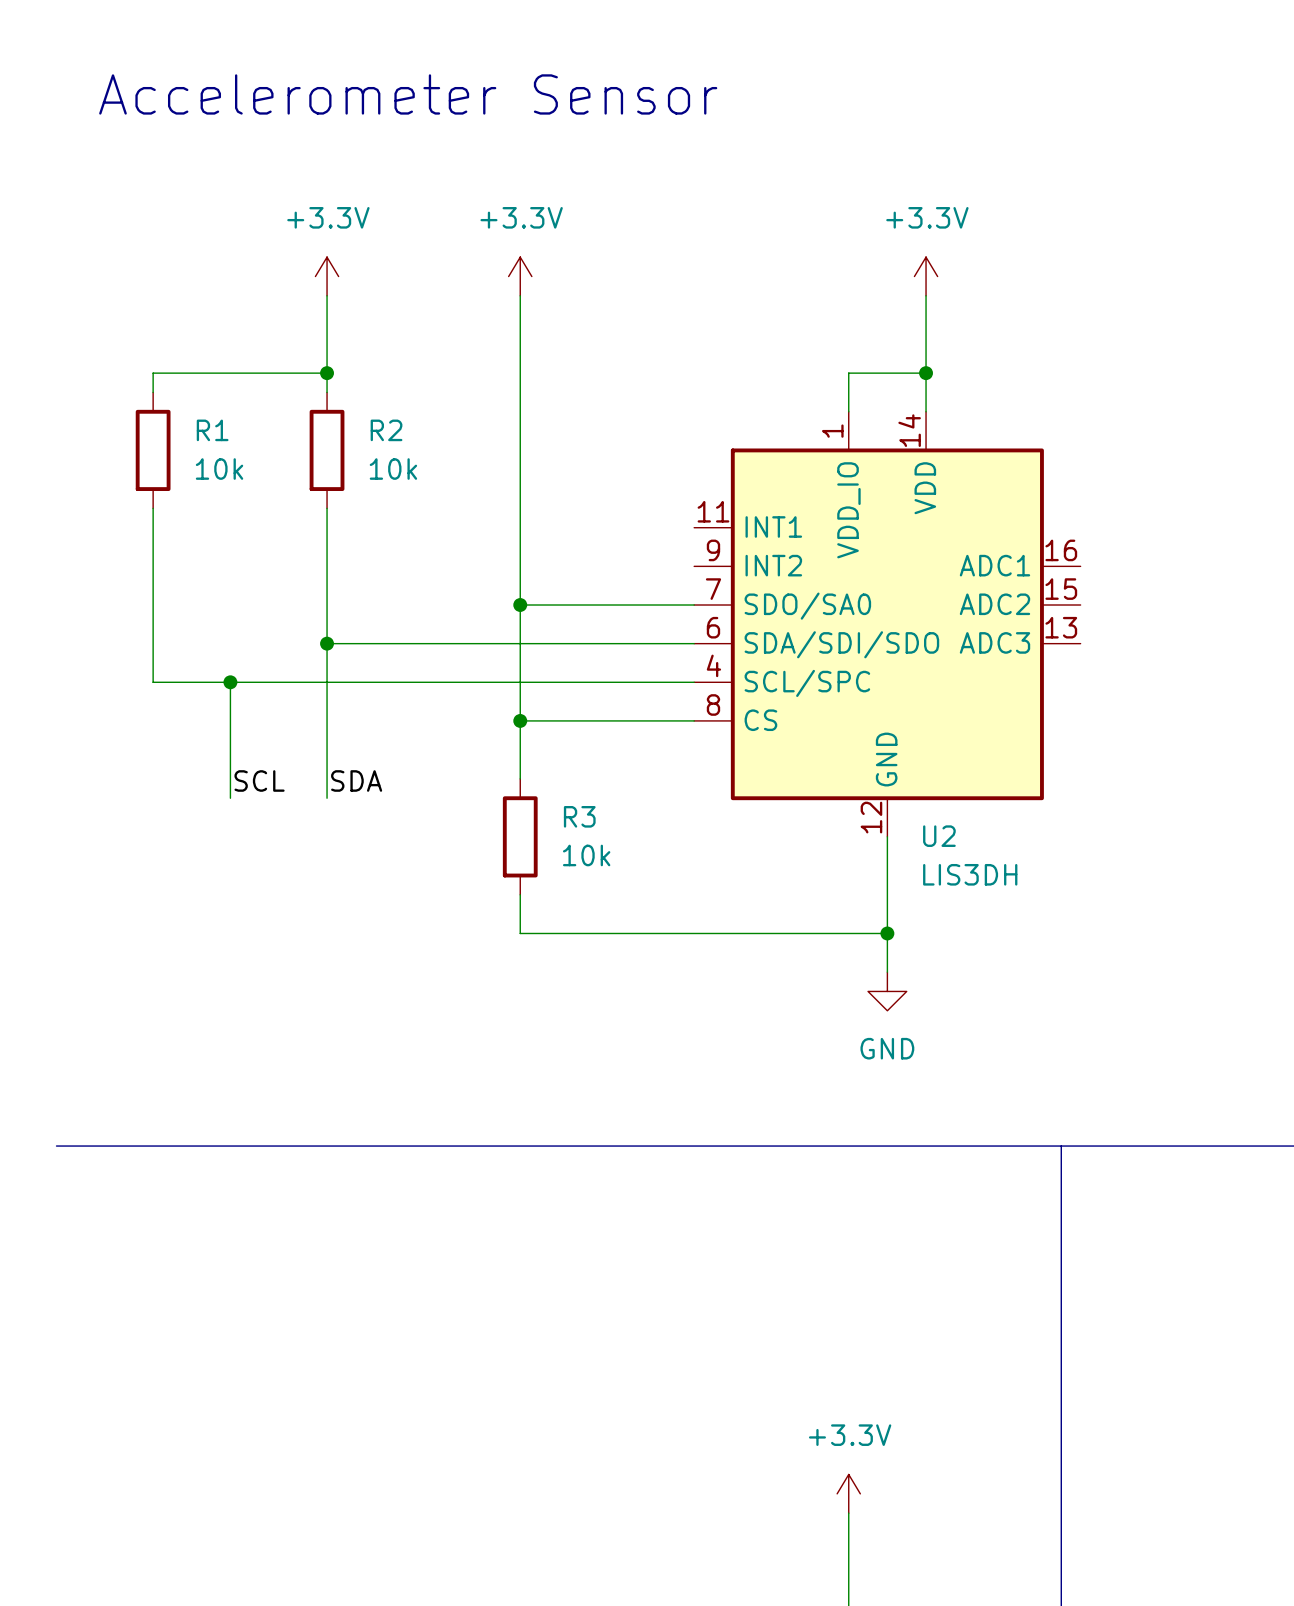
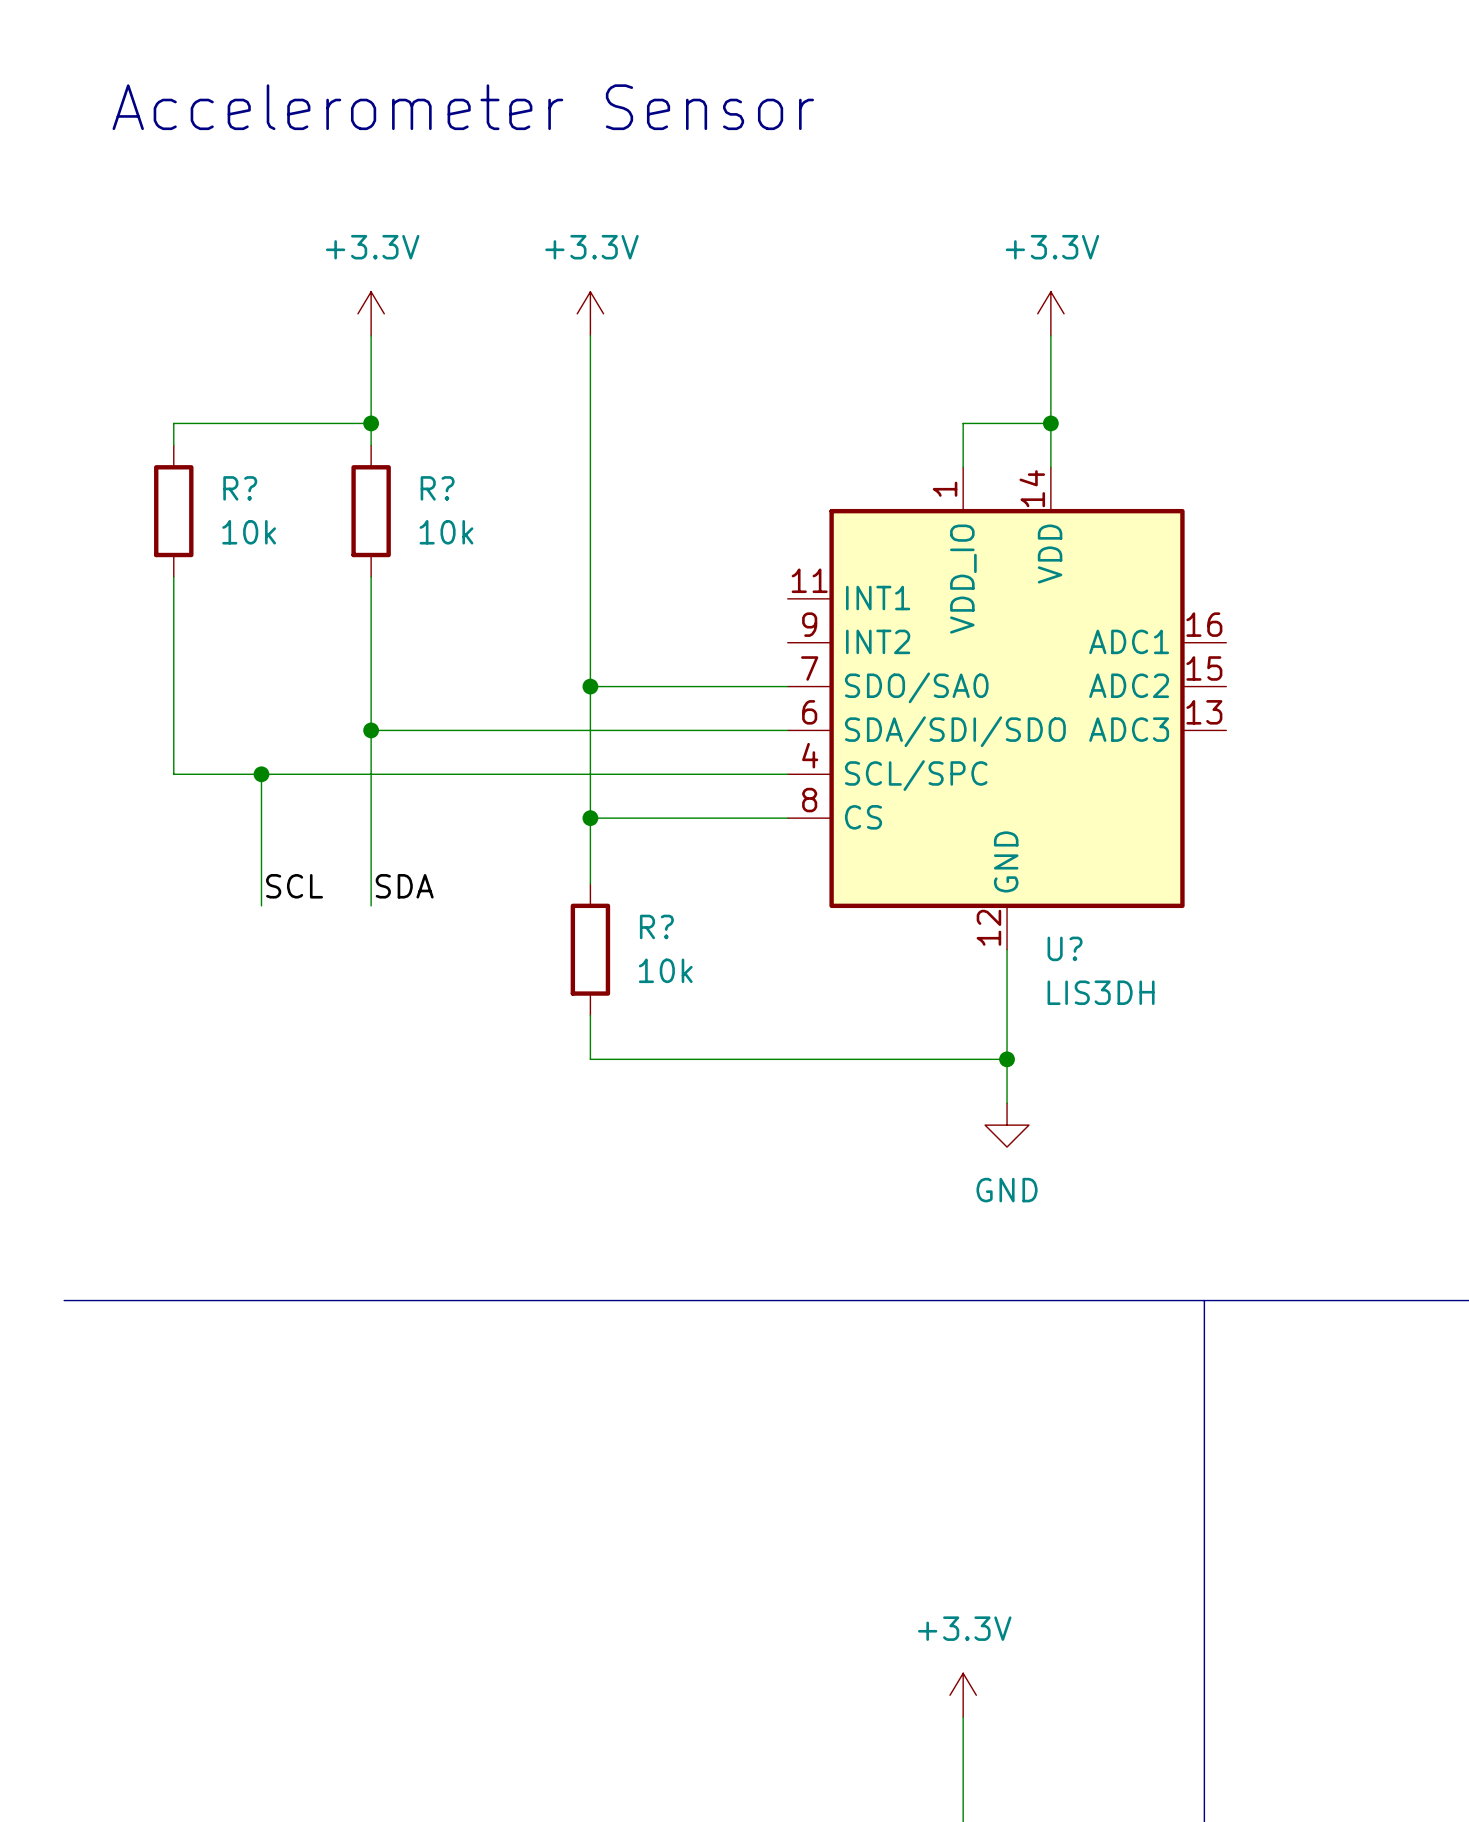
R1 name: R1 (212, 430) -> R? (240, 488)
R2 name: R2 (386, 430) -> R? (437, 488)
R3 name: R3 (579, 816) -> R? (656, 926)
U2 name: U2 (939, 836) -> U? (1065, 948)

